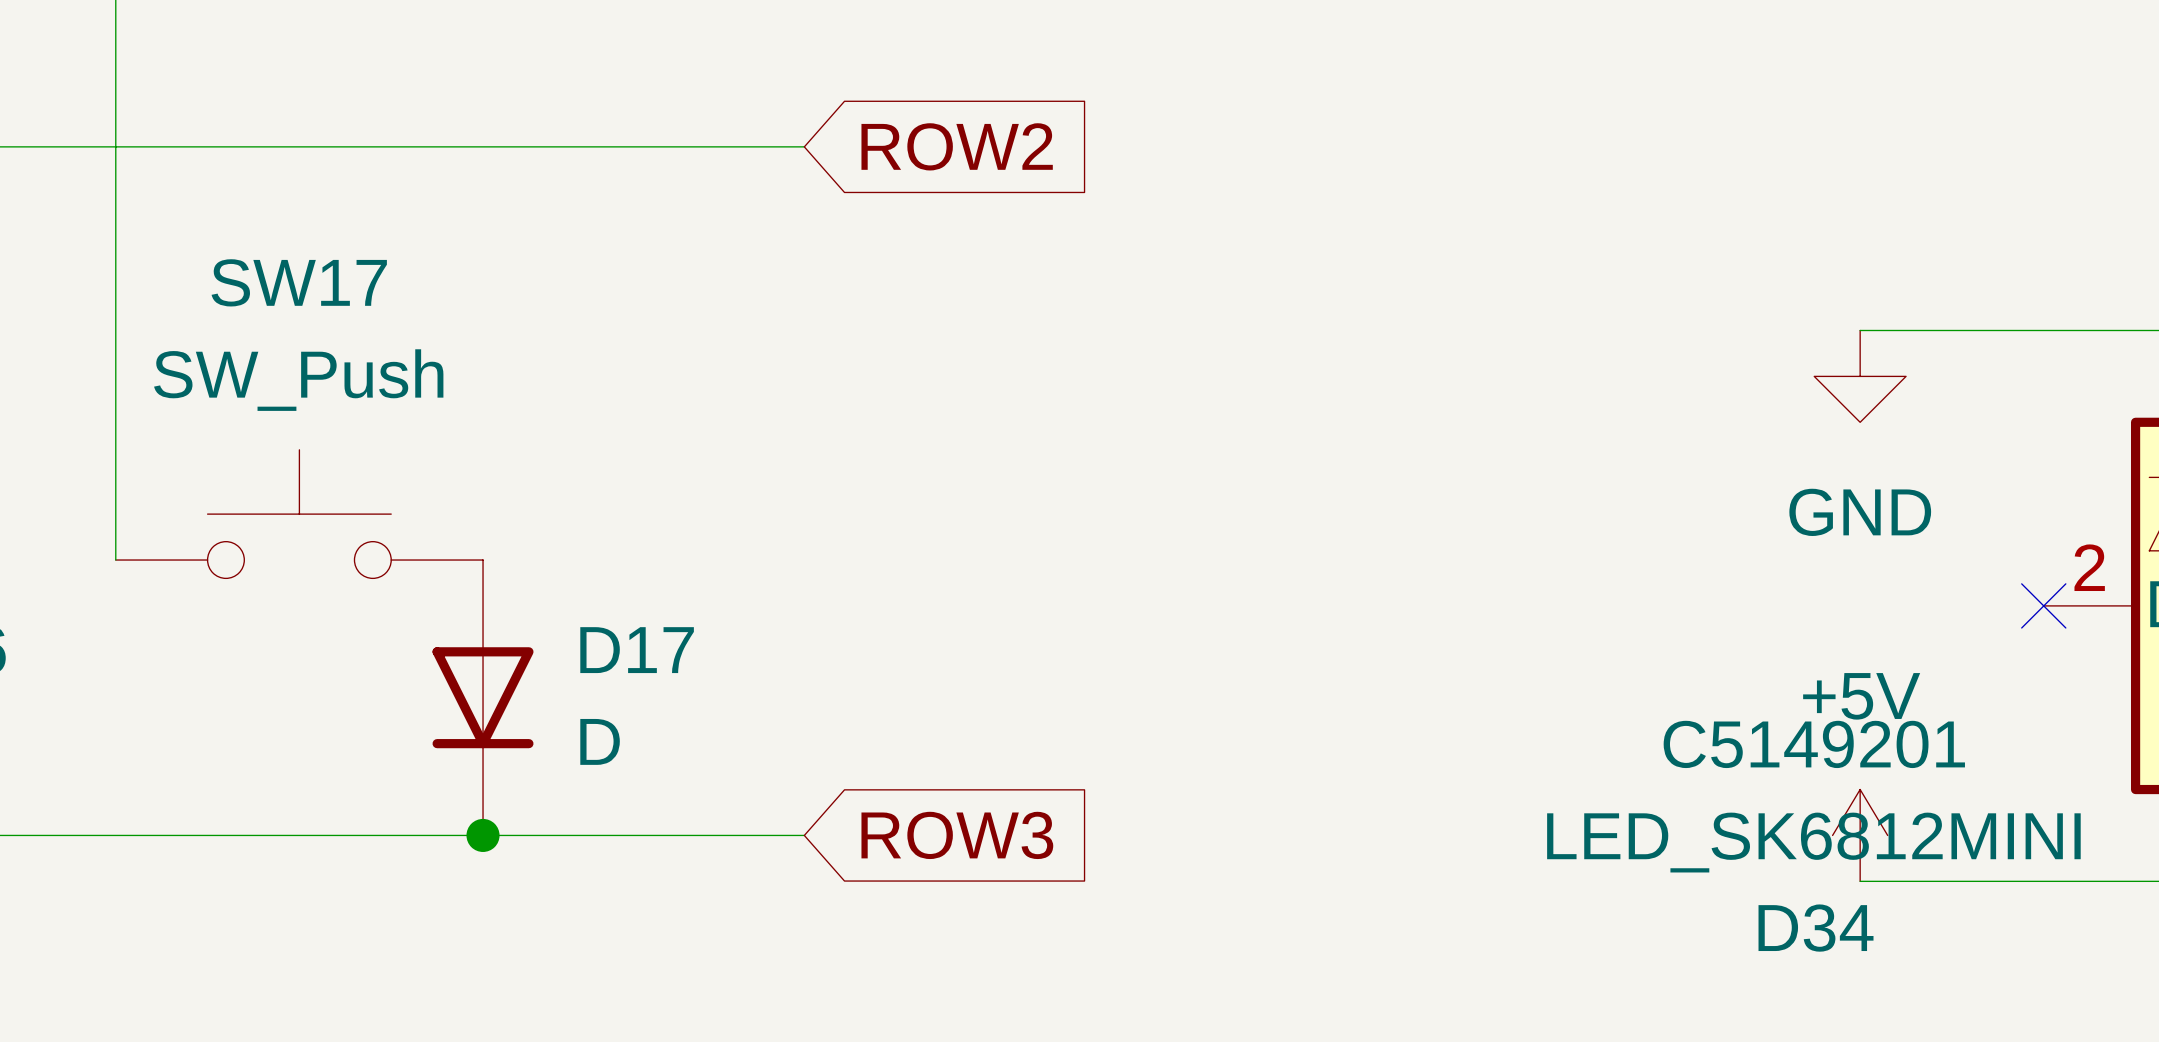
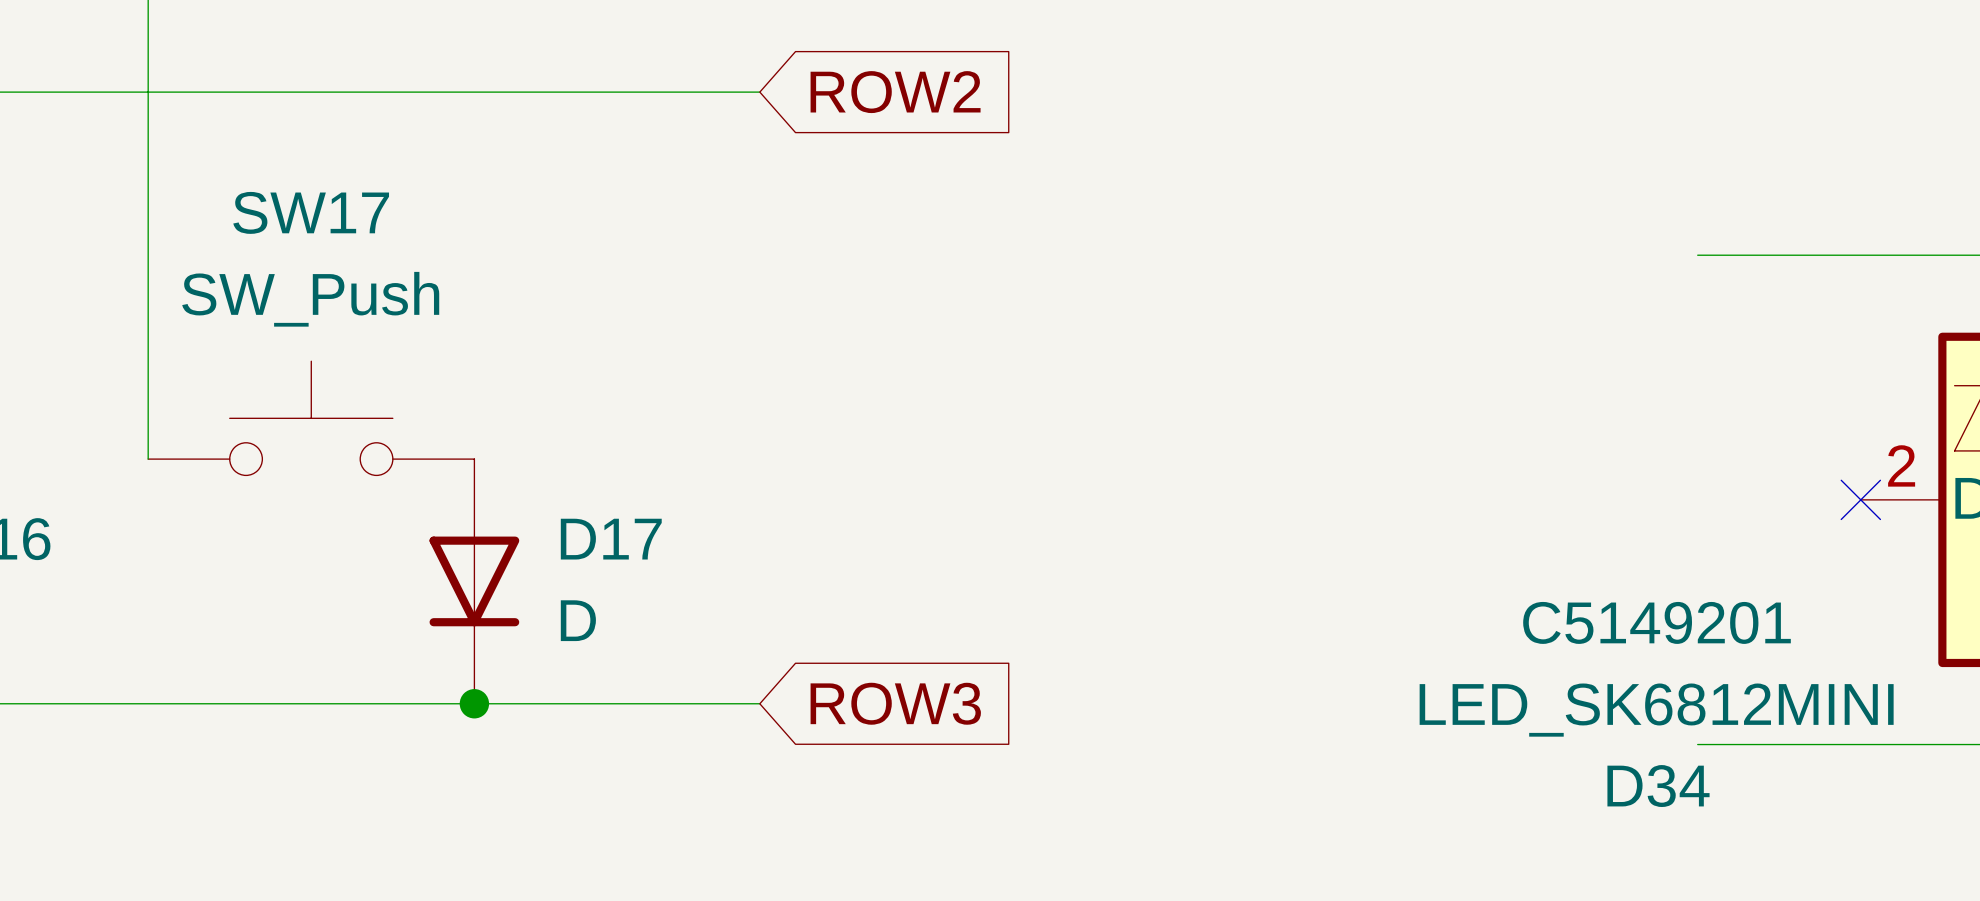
power symbol: GND (1860, 376) -> none
power symbol: +5V (1860, 835) -> none

